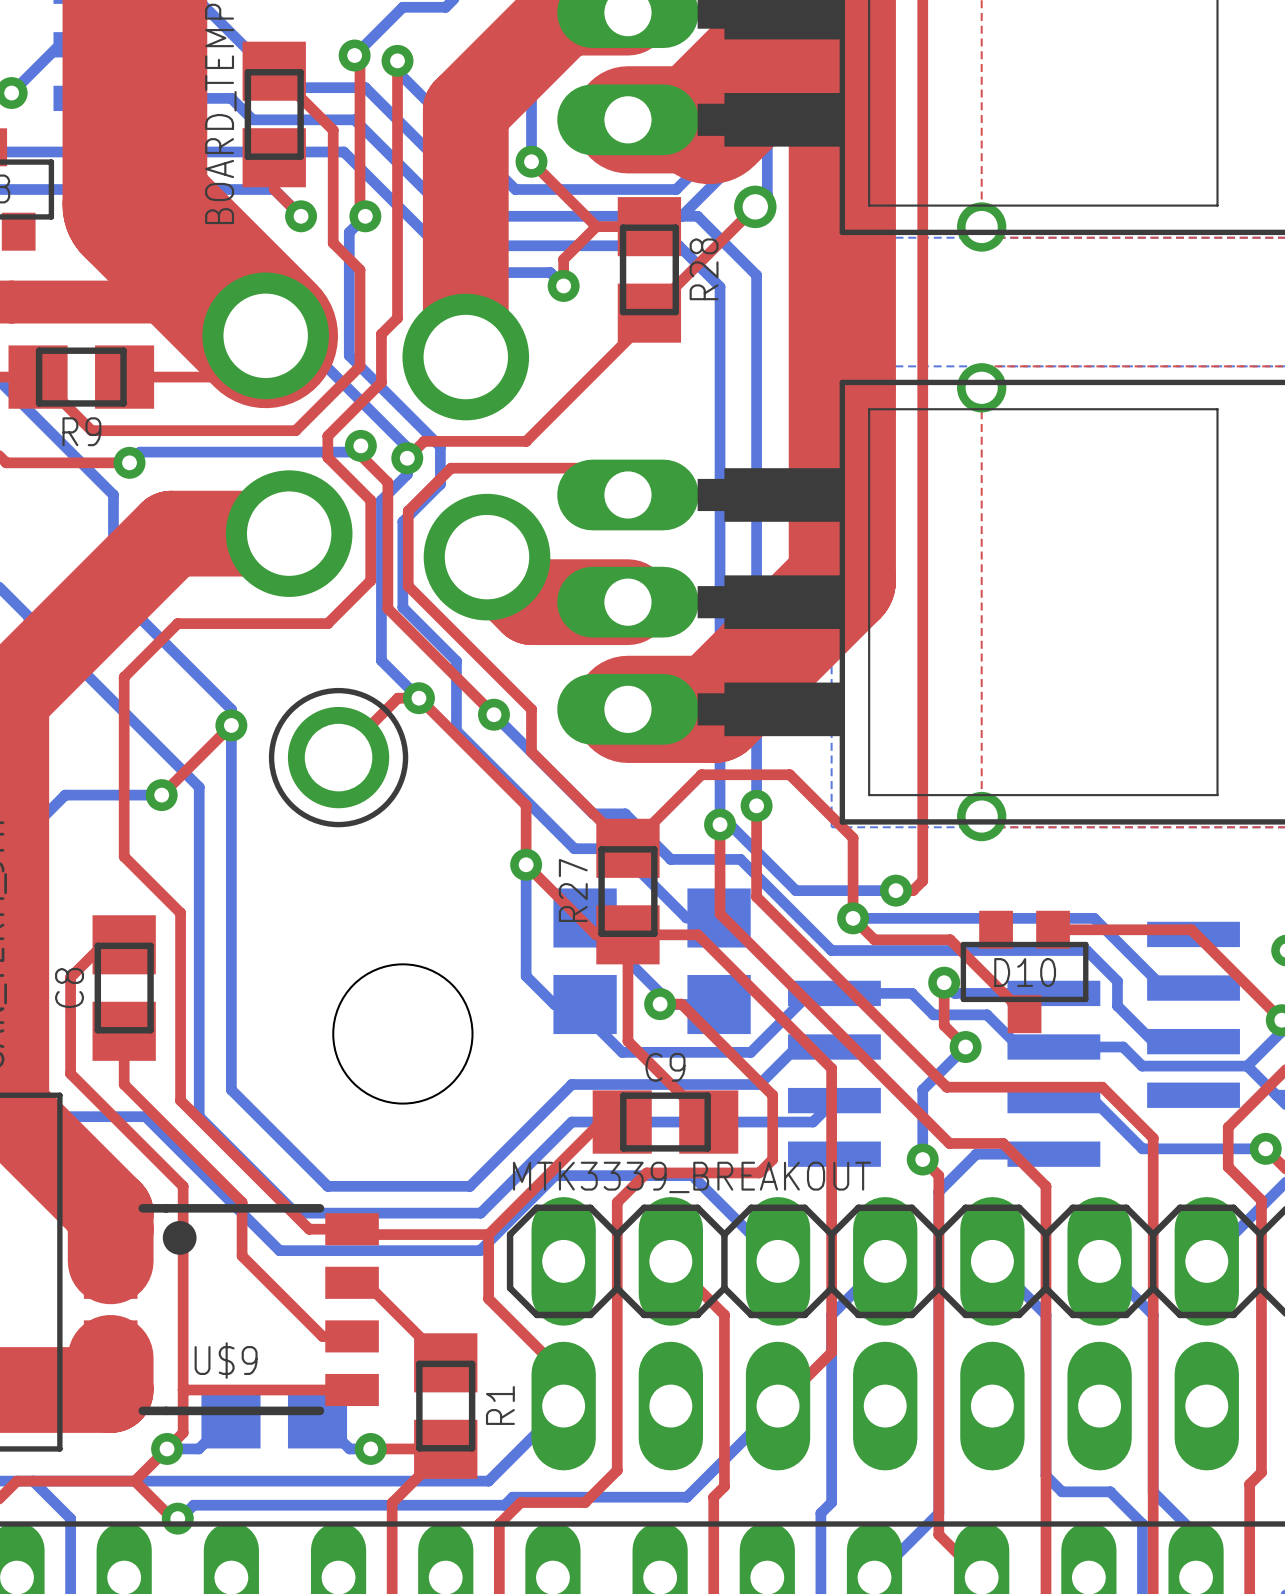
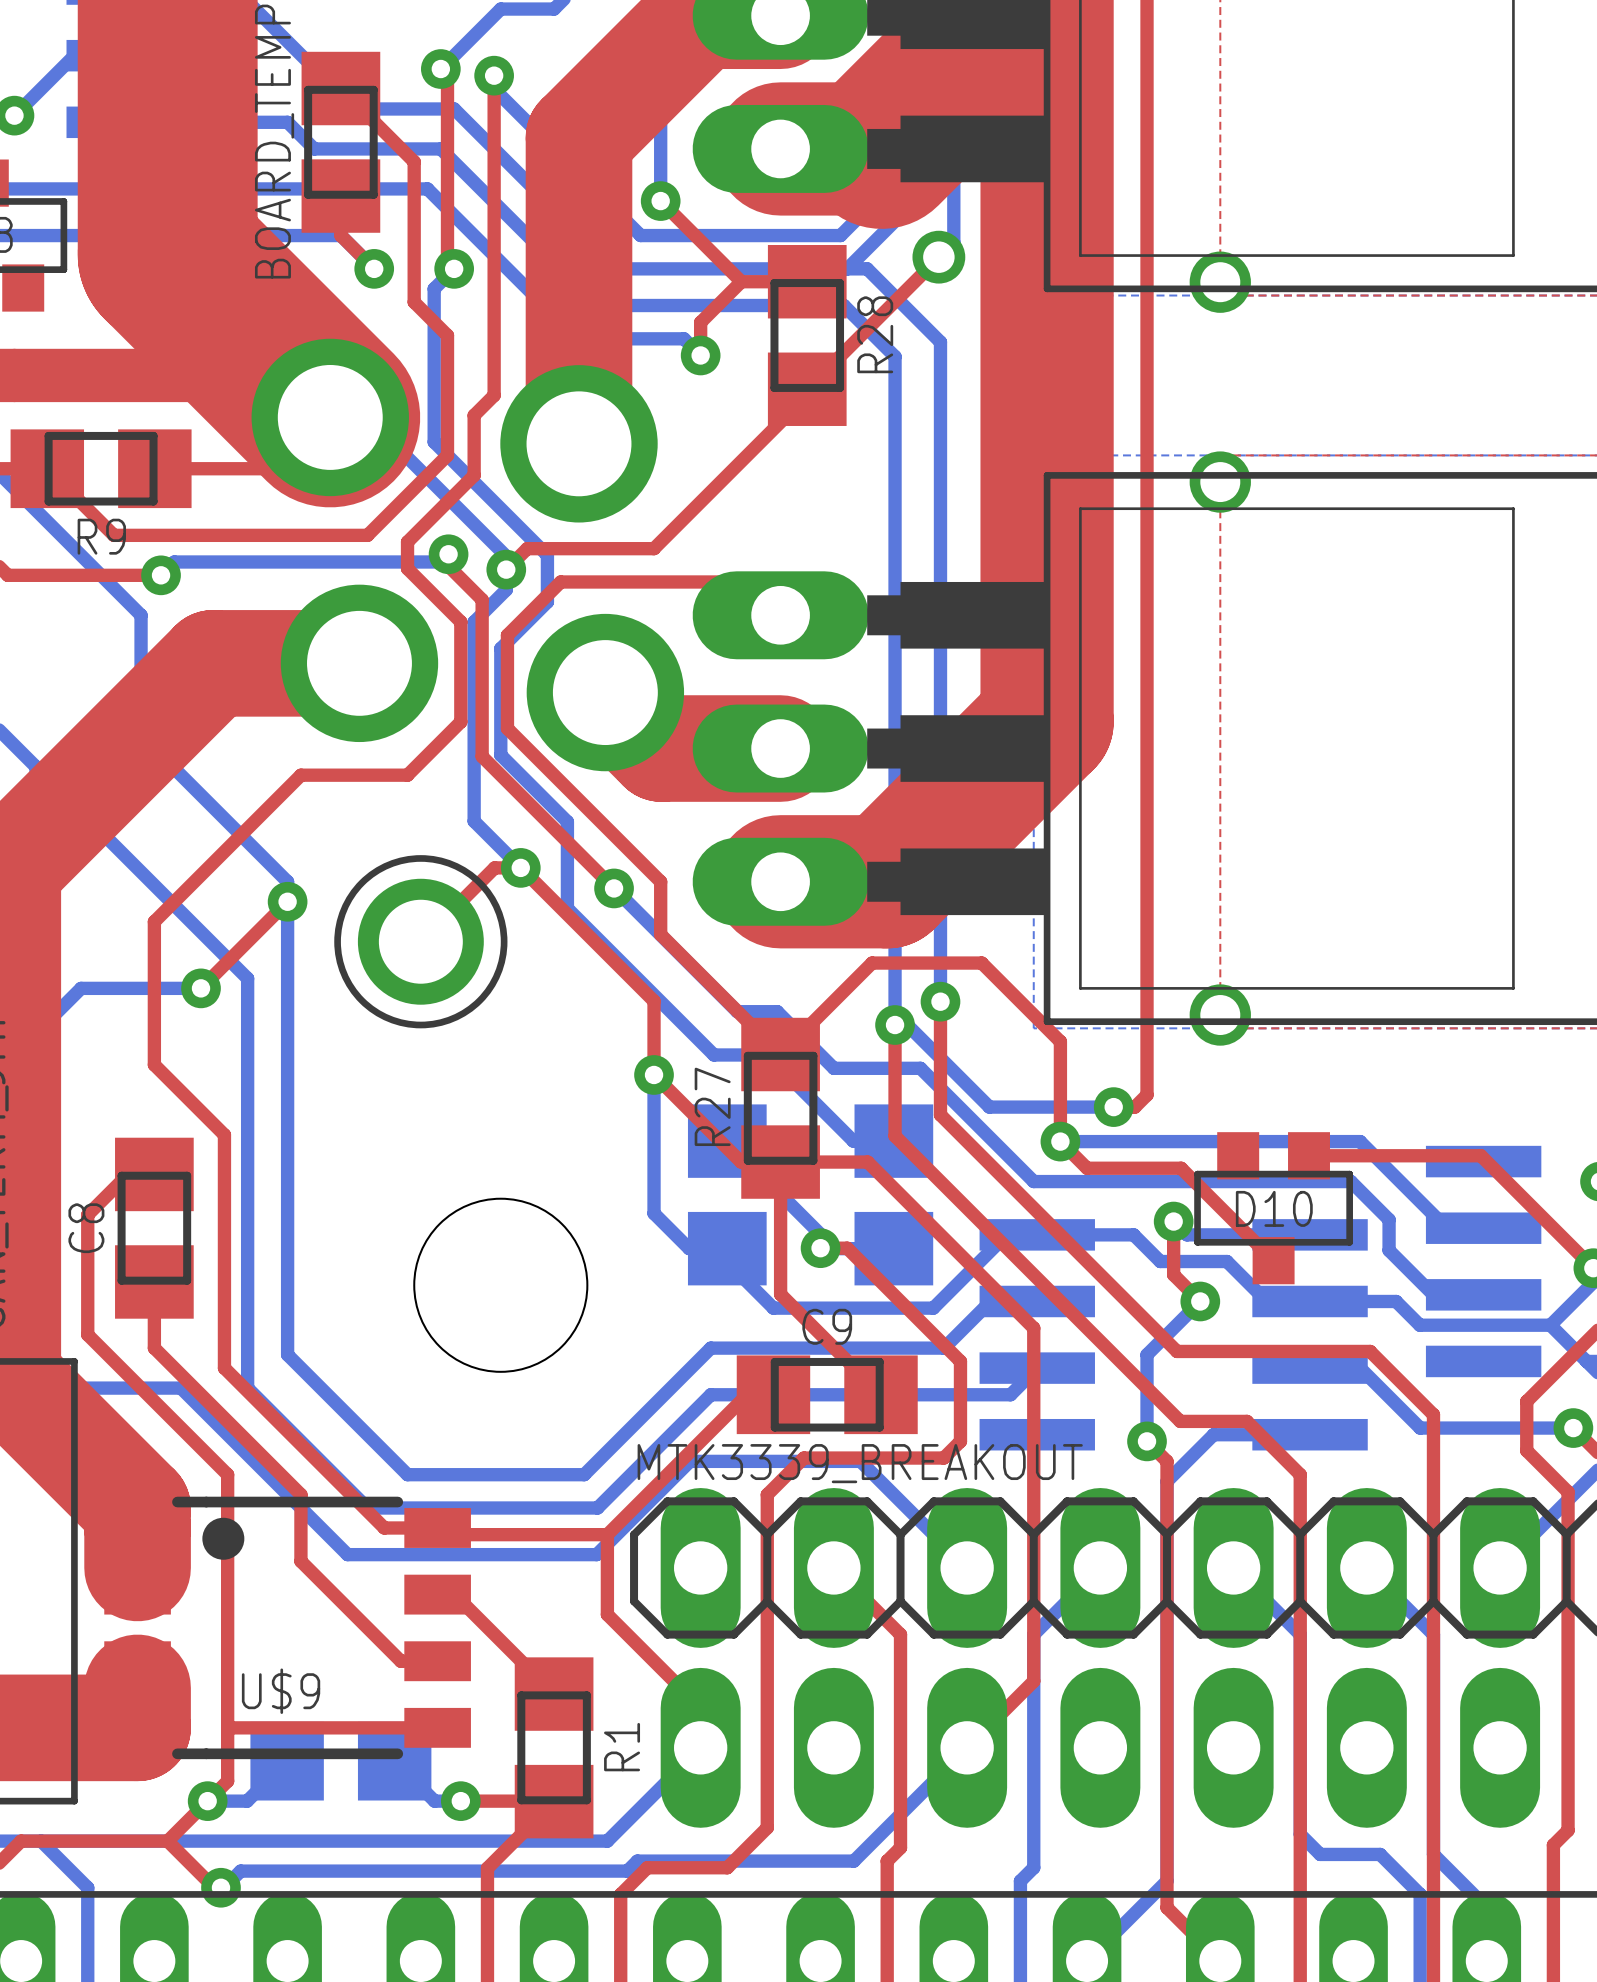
top track: (242, 623) (177, 623) (124, 677) (124, 741) -> (300, 775) (154, 921)

